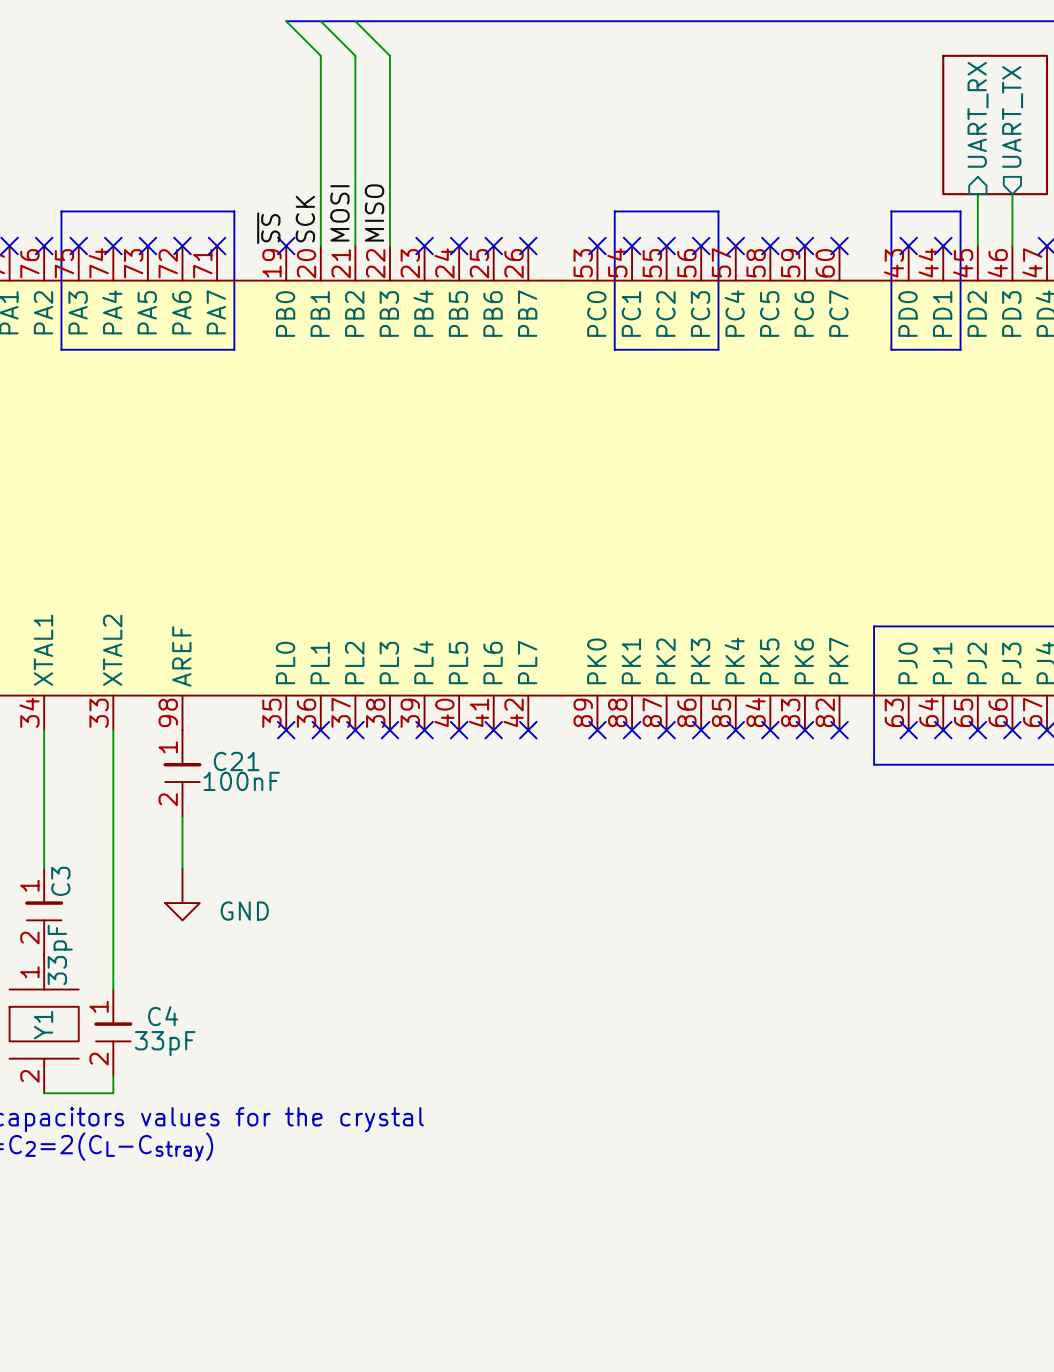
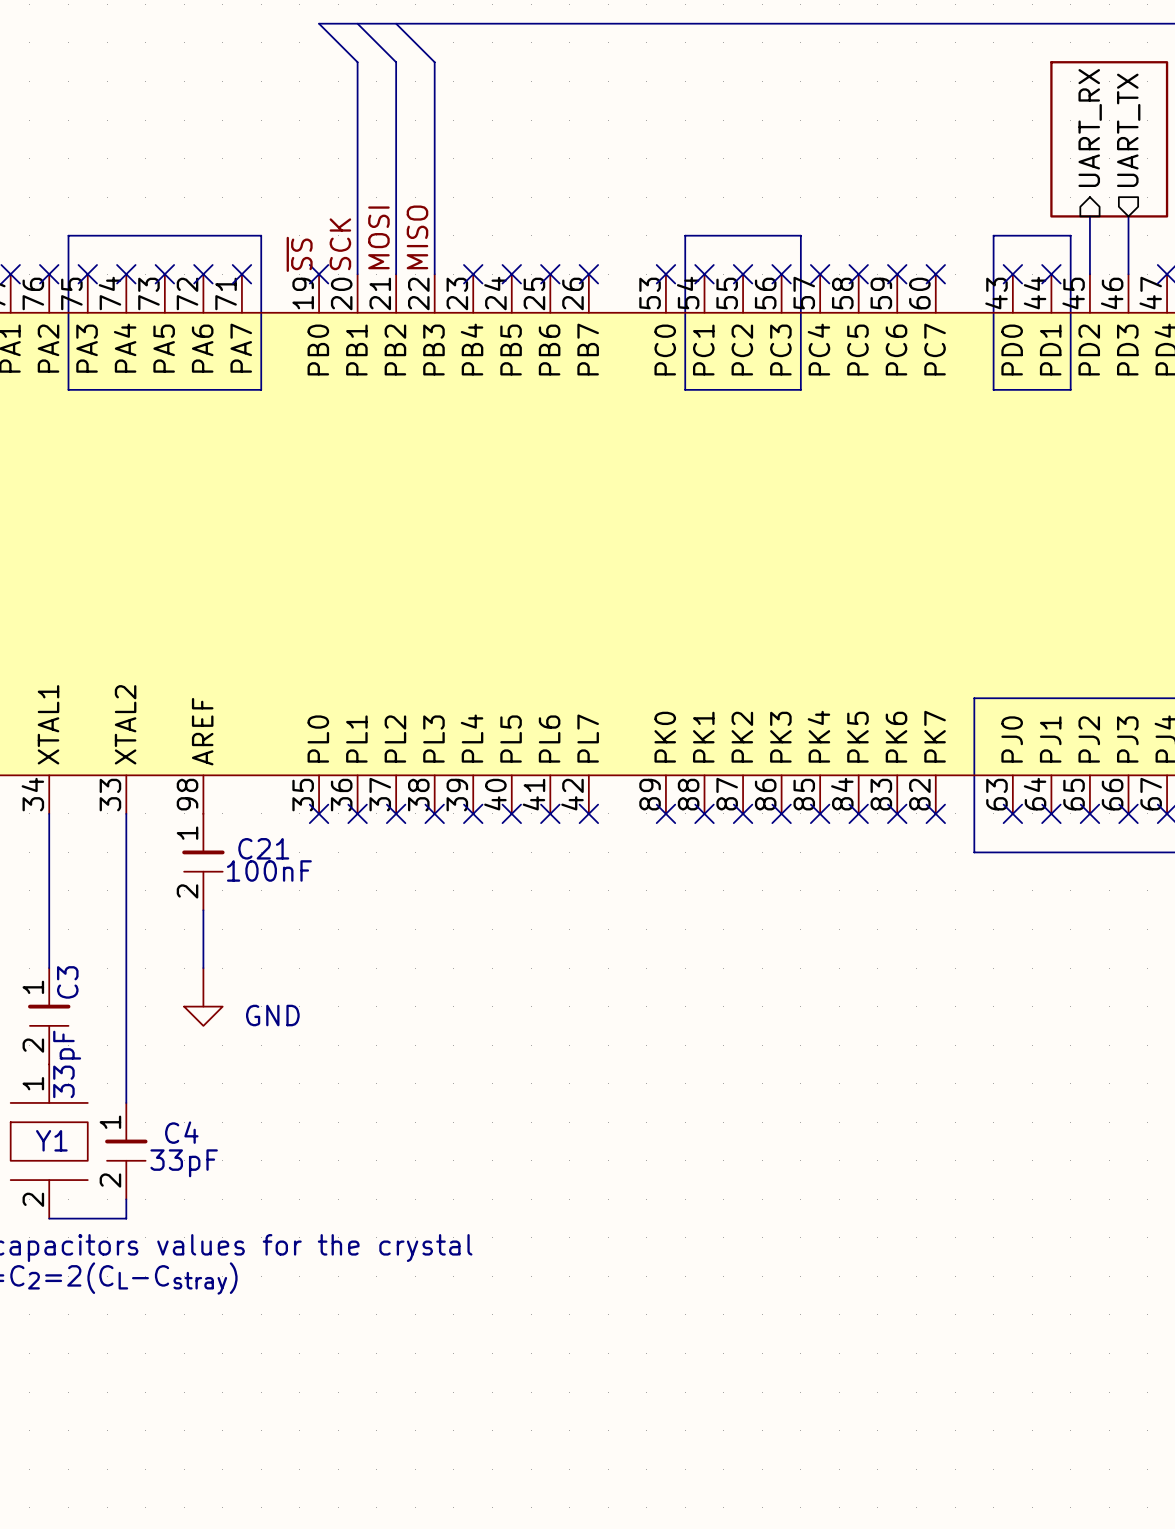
Y1 name rotation: 0° (43, 1025) -> 90° clockwise (51, 1140)

